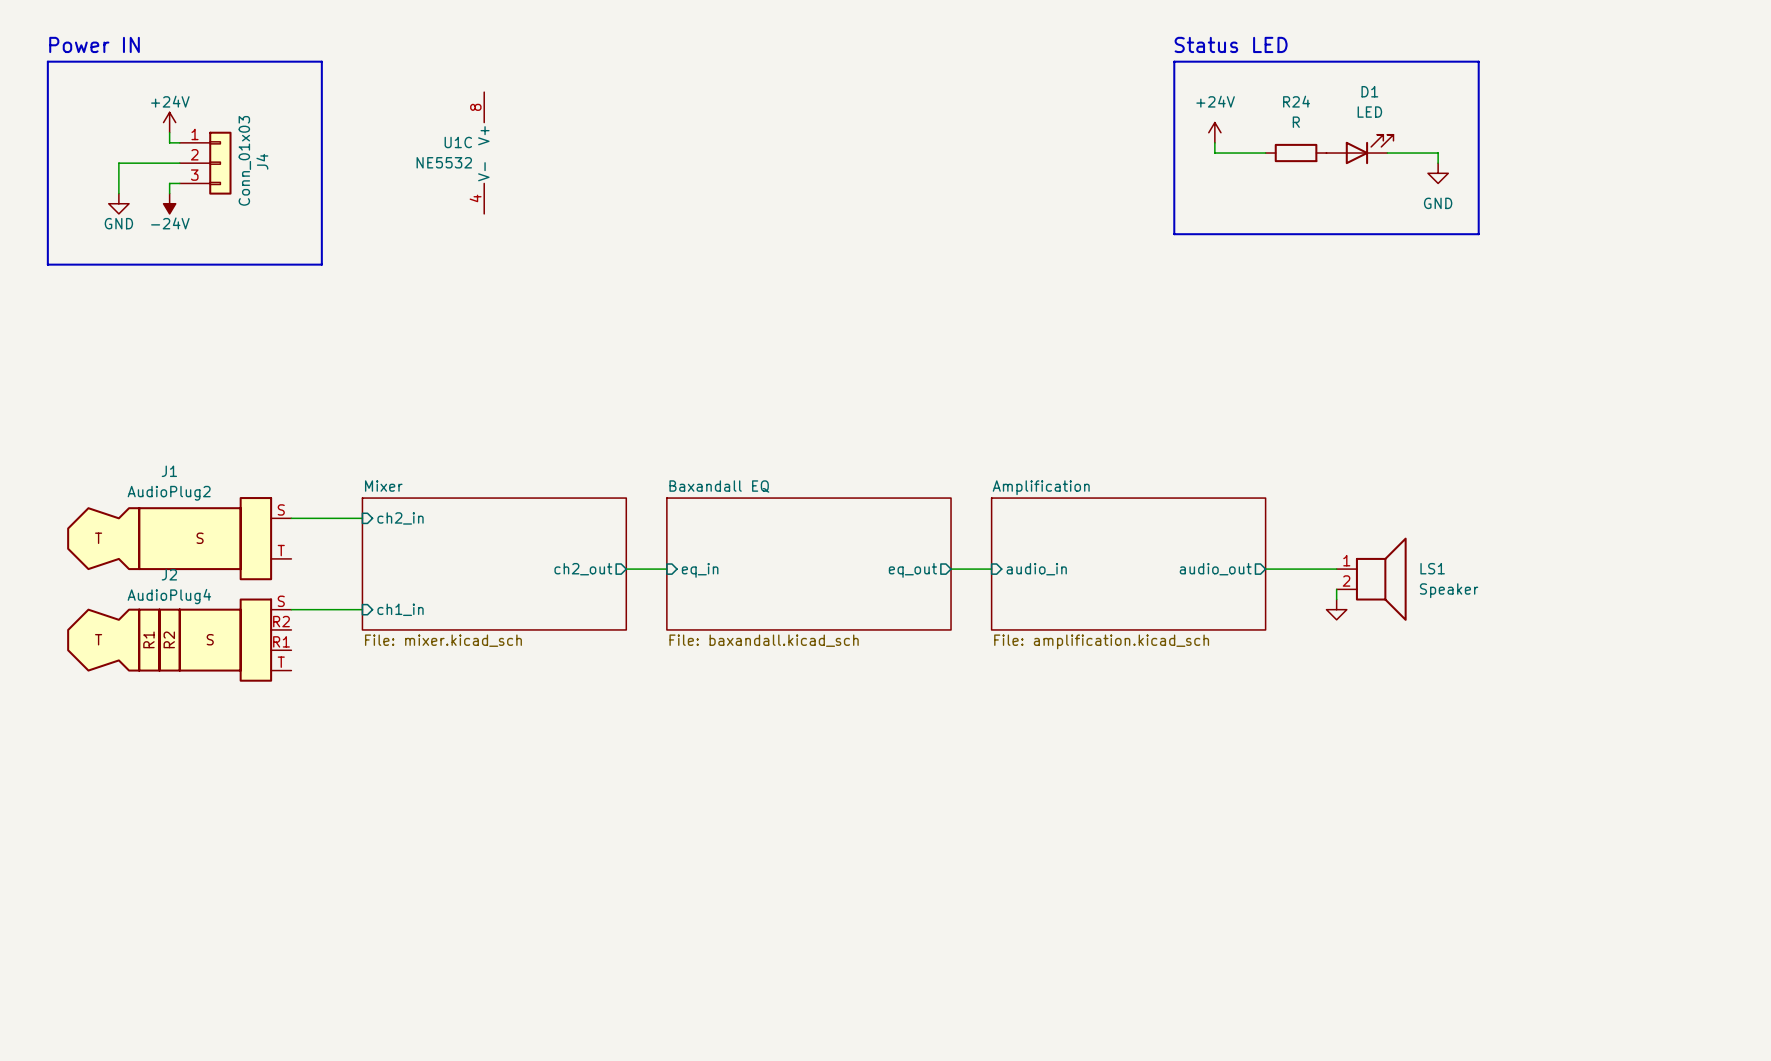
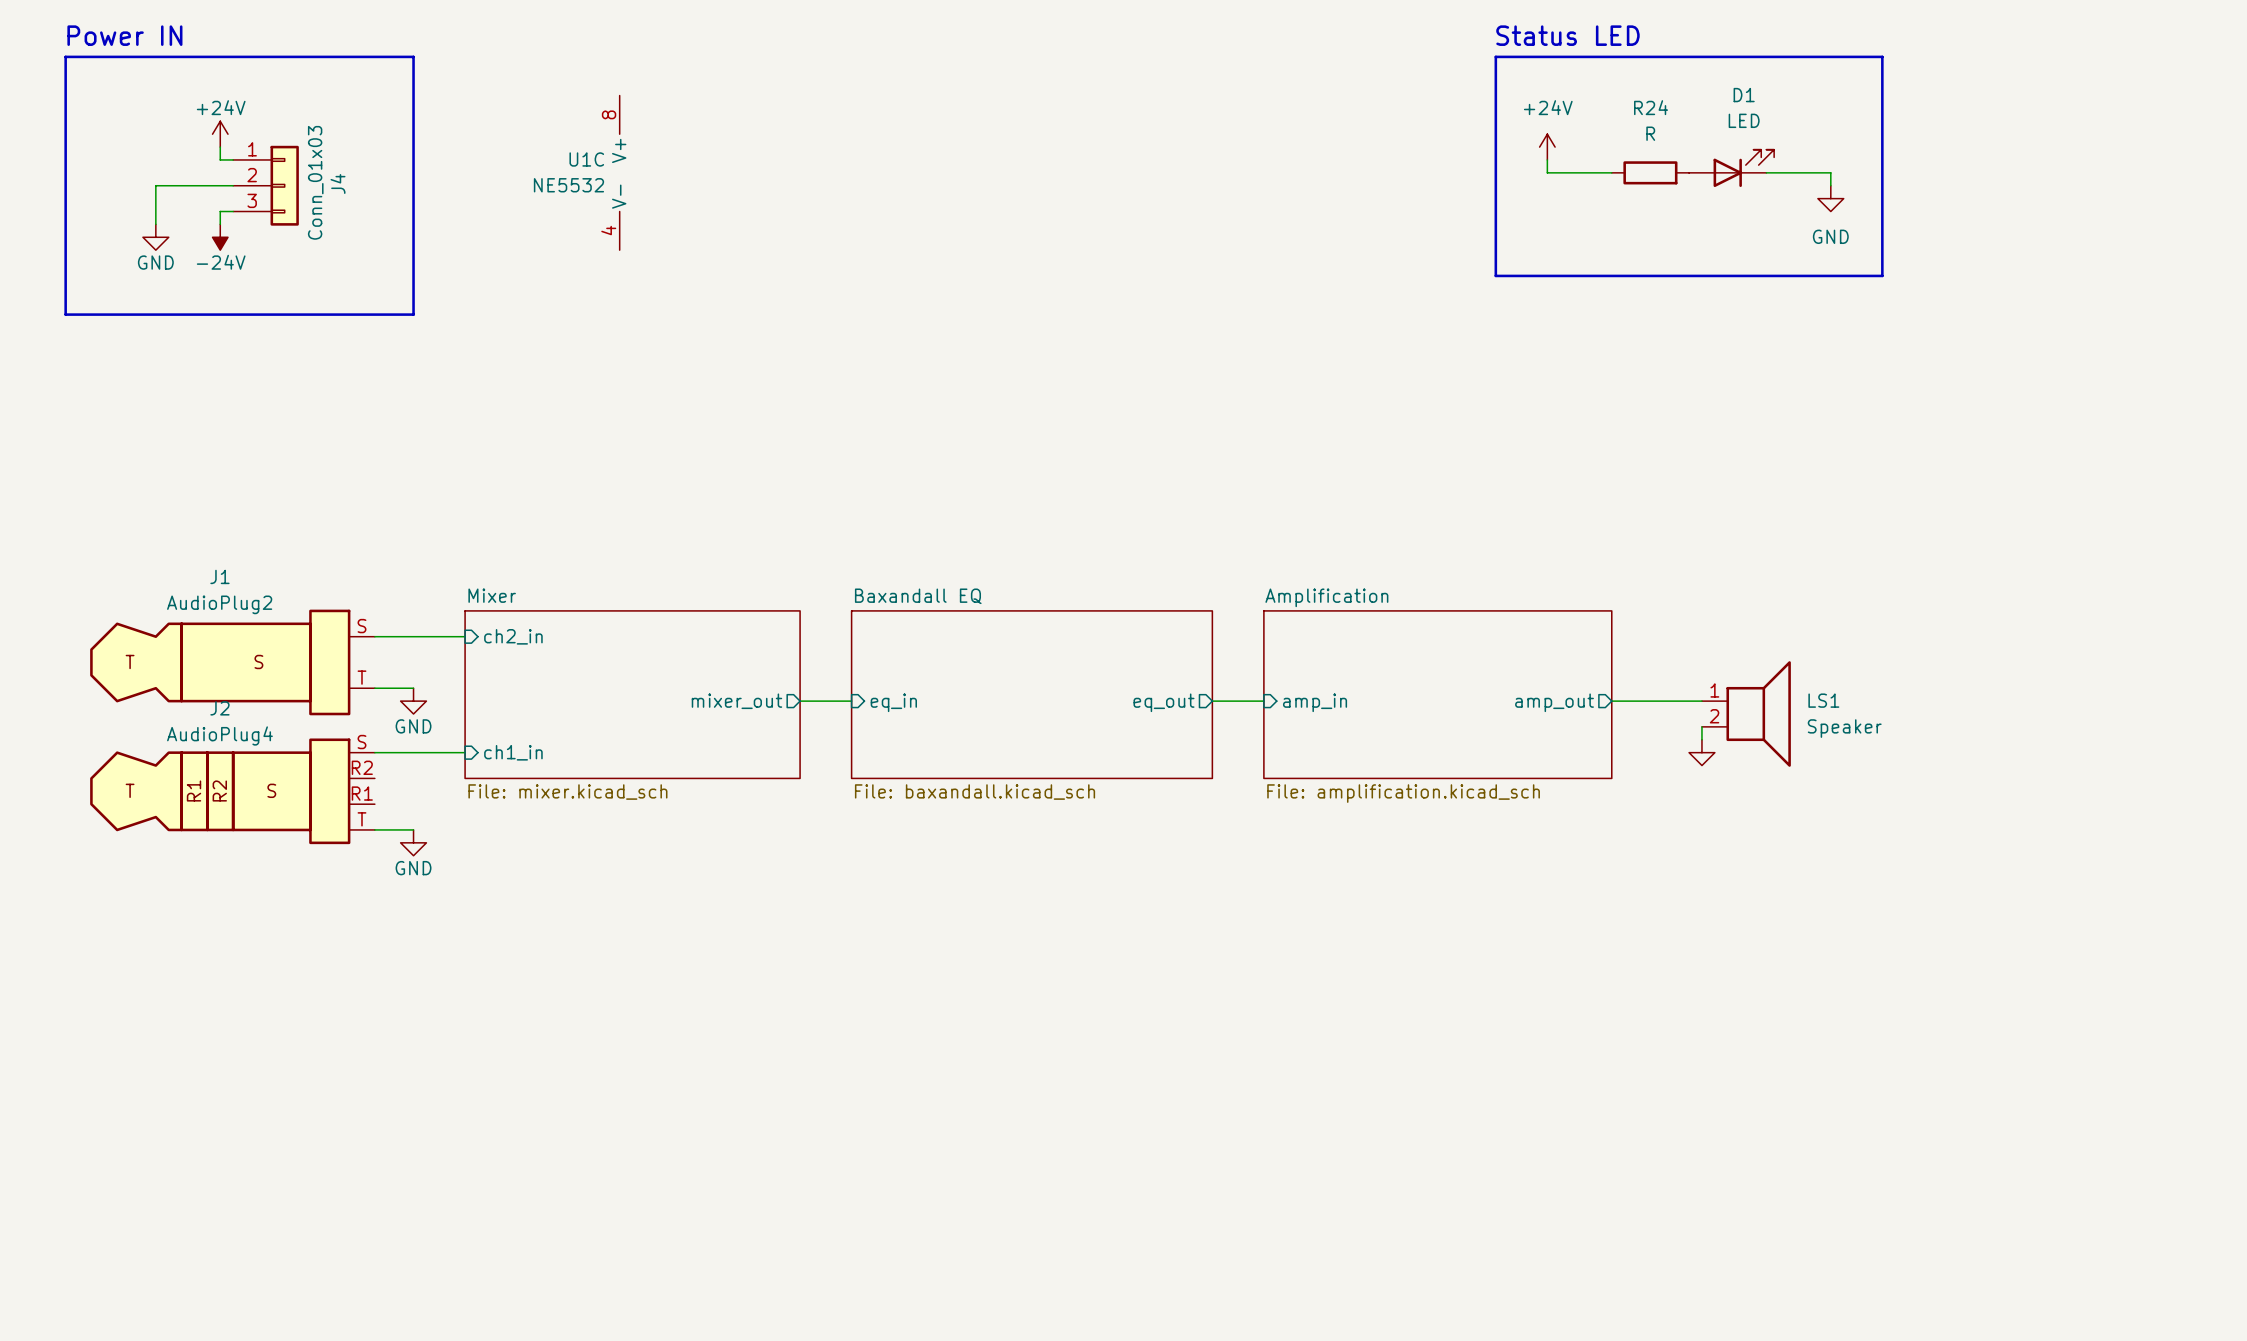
wire: none -> (374, 688) (413, 688)
power symbol: none -> GND (413, 701)
sheet pin: ch2_out (583, 569) -> mixer_out (736, 701)
sheet pin: audio_in (1036, 569) -> amp_in (1315, 702)
sheet pin: audio_out (1215, 569) -> amp_out (1554, 702)
wire: none -> (374, 829) (413, 829)
power symbol: none -> GND (413, 842)

